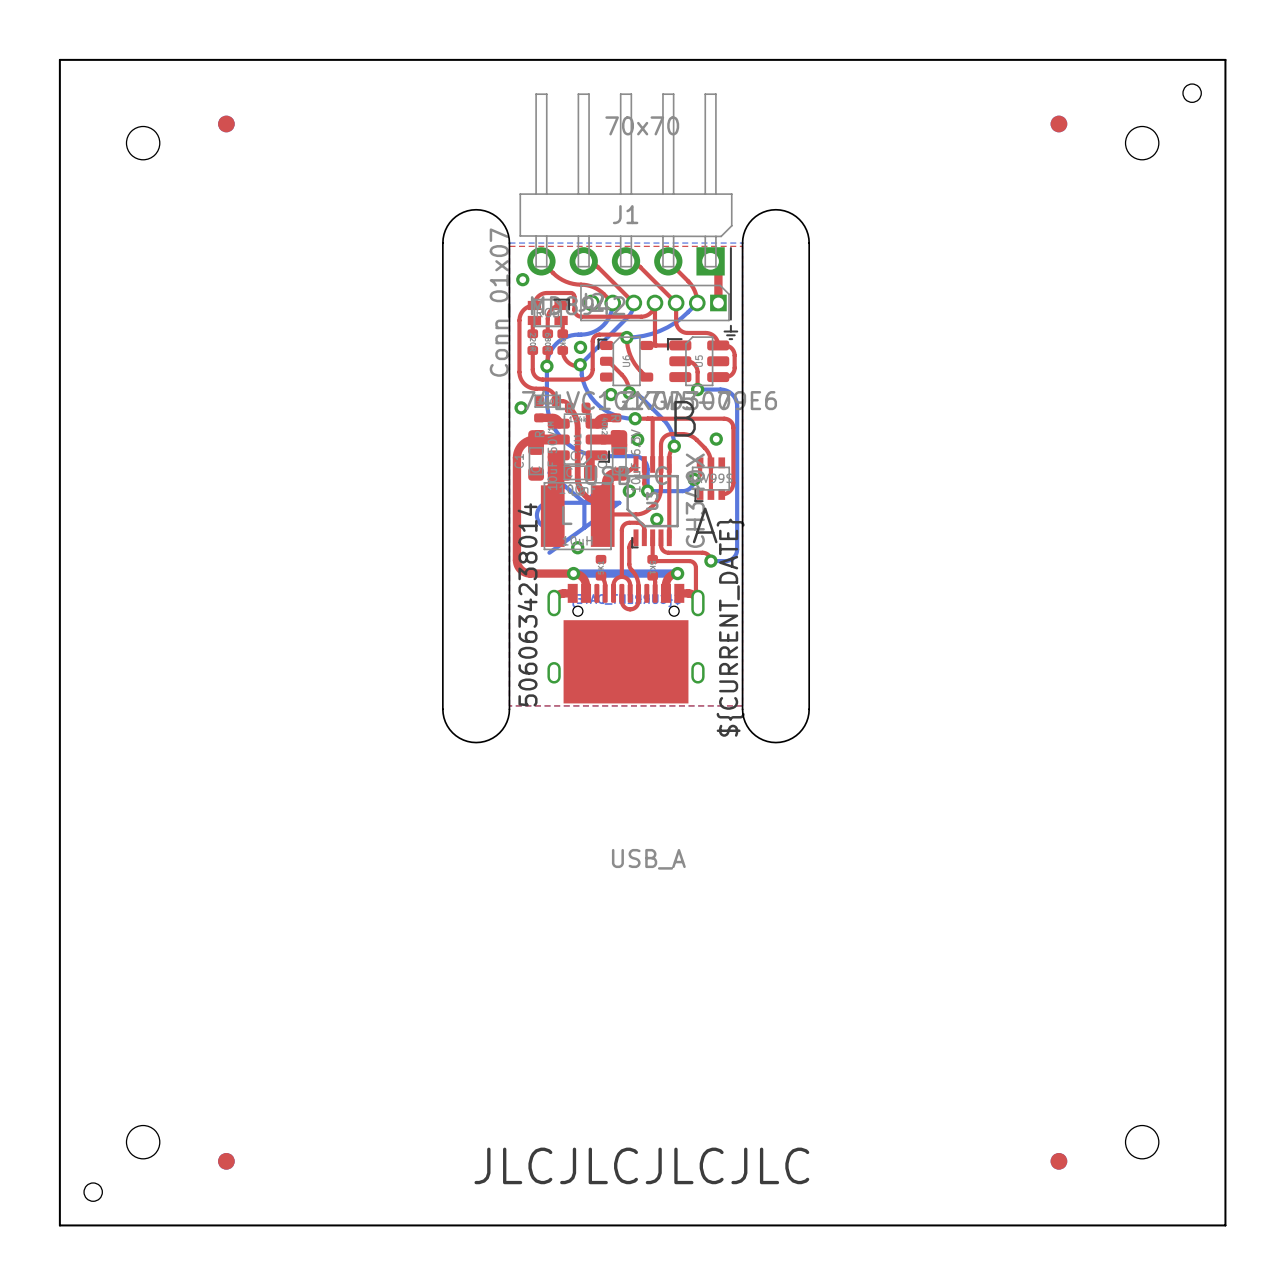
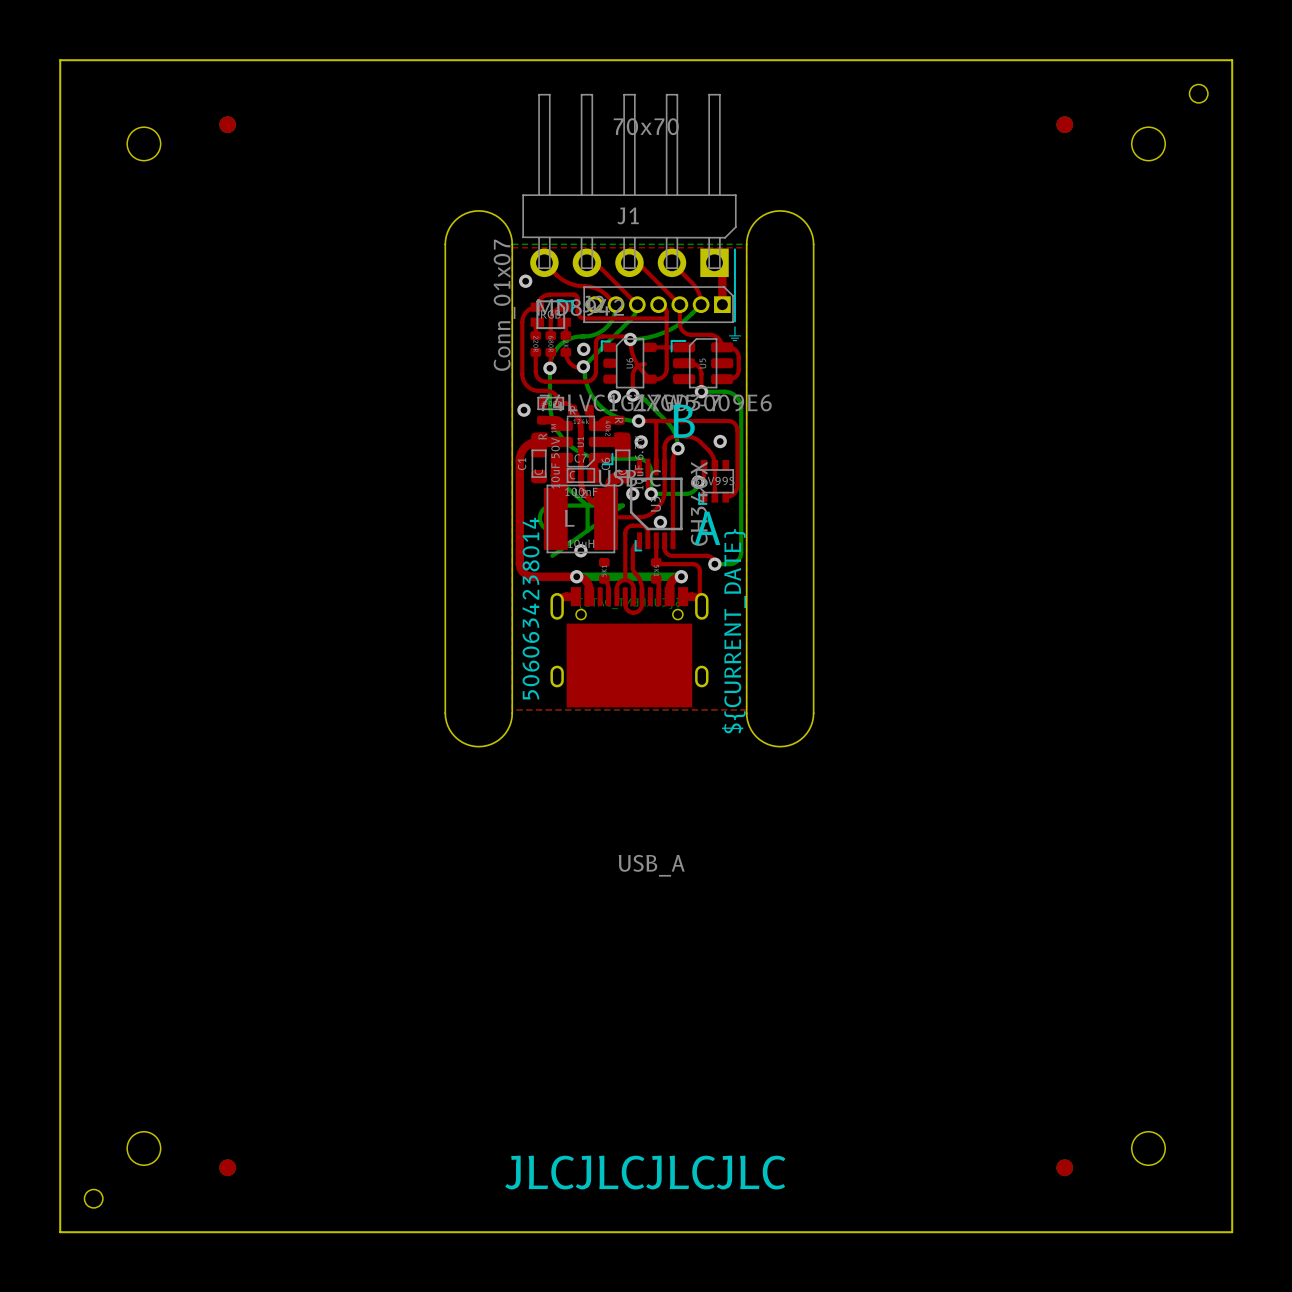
top track: none -> (658, 304) (663, 306) (666, 311) (666, 369) (663, 376) (656, 379)
top track: (641, 316) (650, 312) (654, 302) (655, 345) -> (644, 318) (666, 318)
top track: (606, 361) (625, 378) (629, 392) -> (644, 364) (637, 366) (633, 372) (632, 395)

